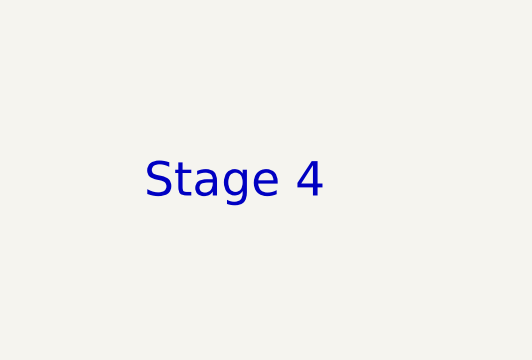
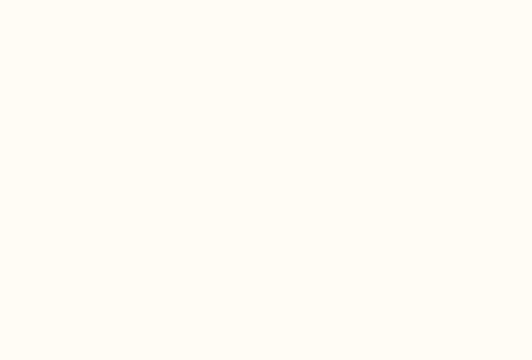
text: Stage 4 (234, 182) -> none

